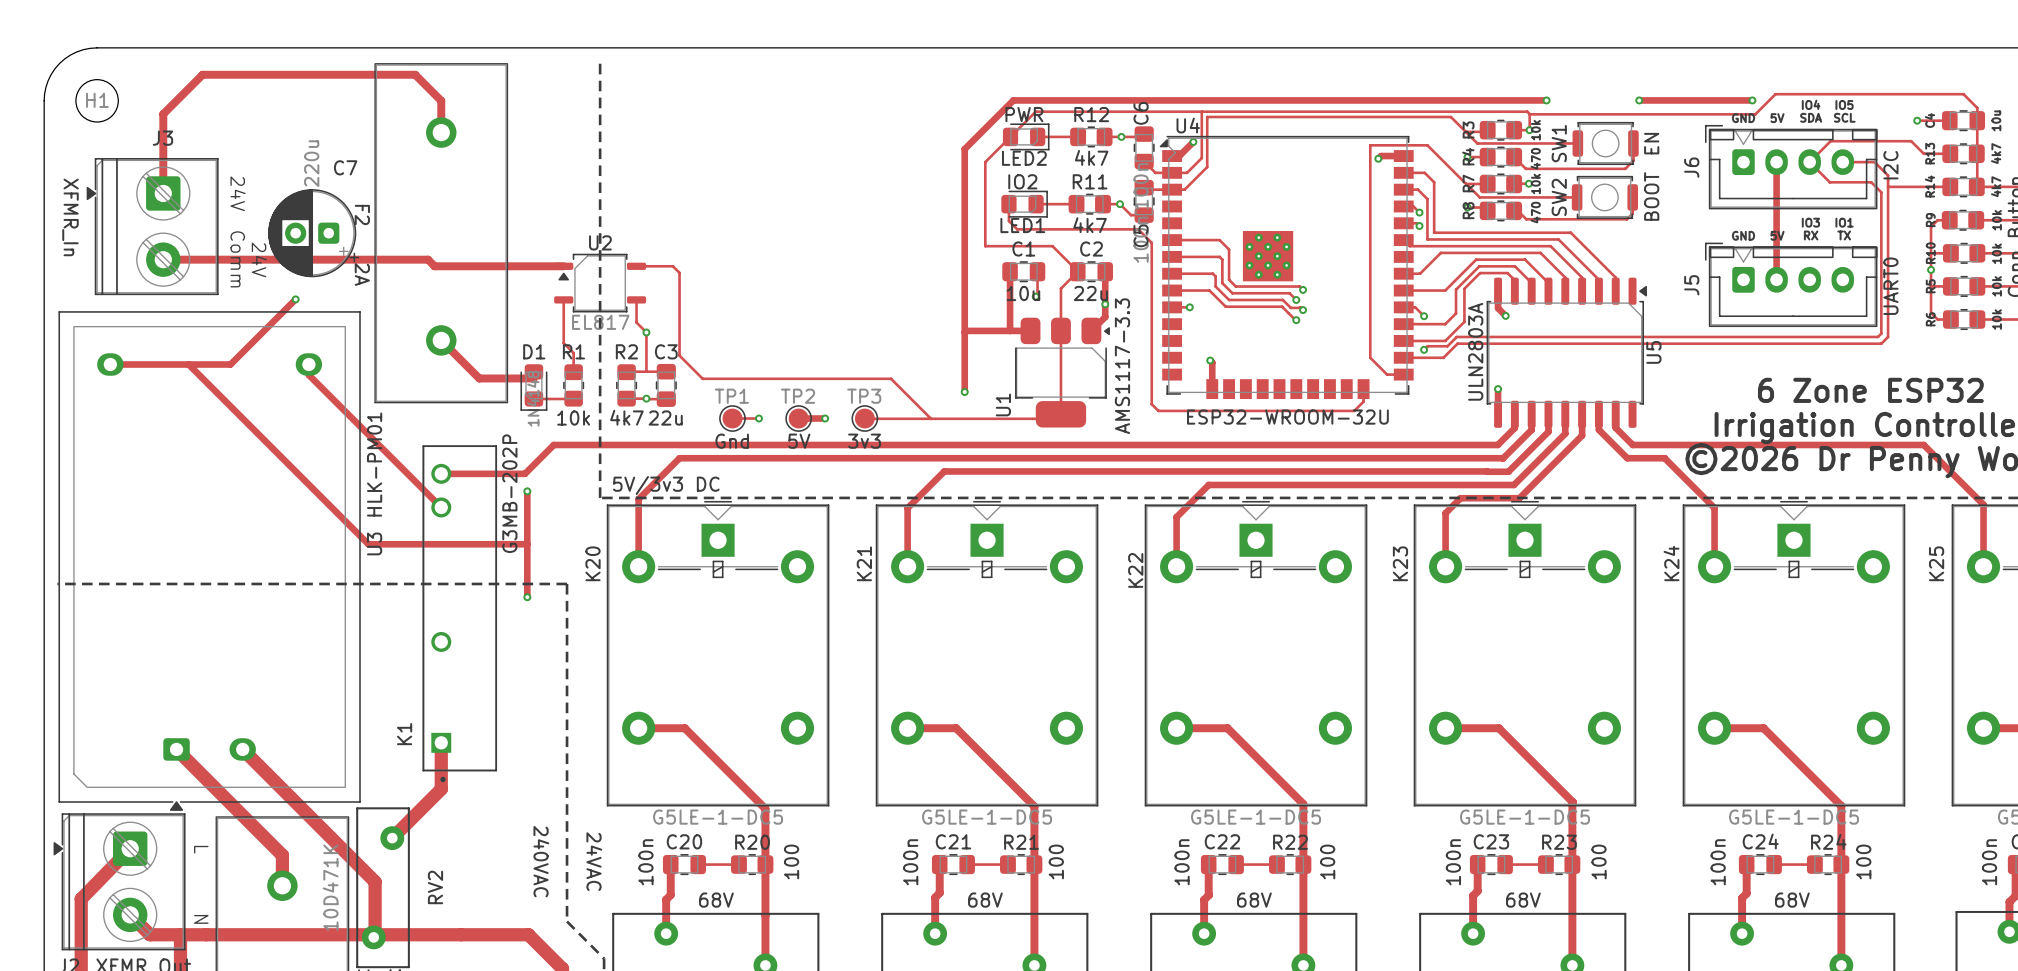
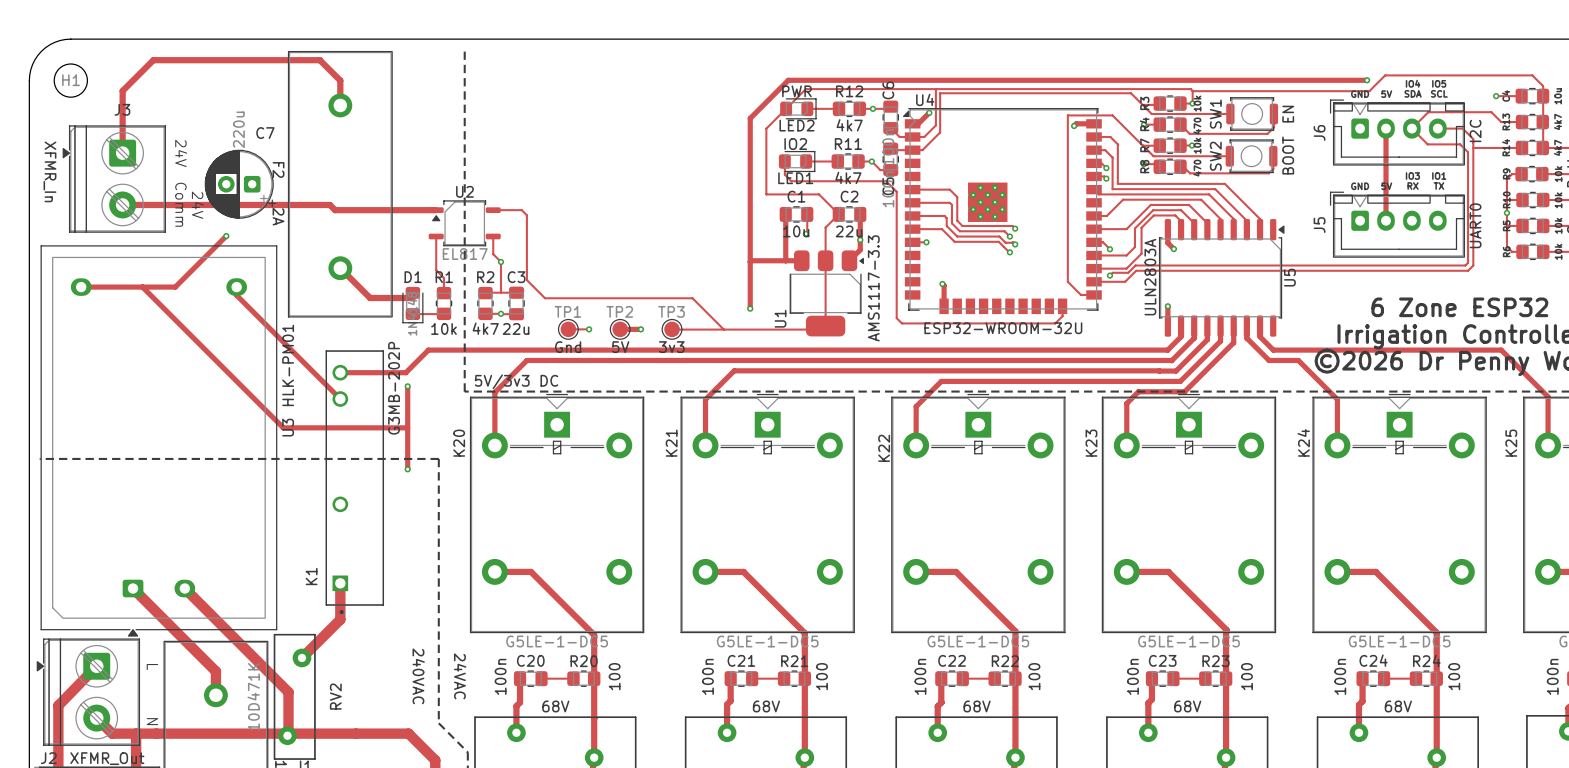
track: none -> (1205, 80) (1278, 80)
via: (1546, 100) -> none
via: (1639, 100) -> none

